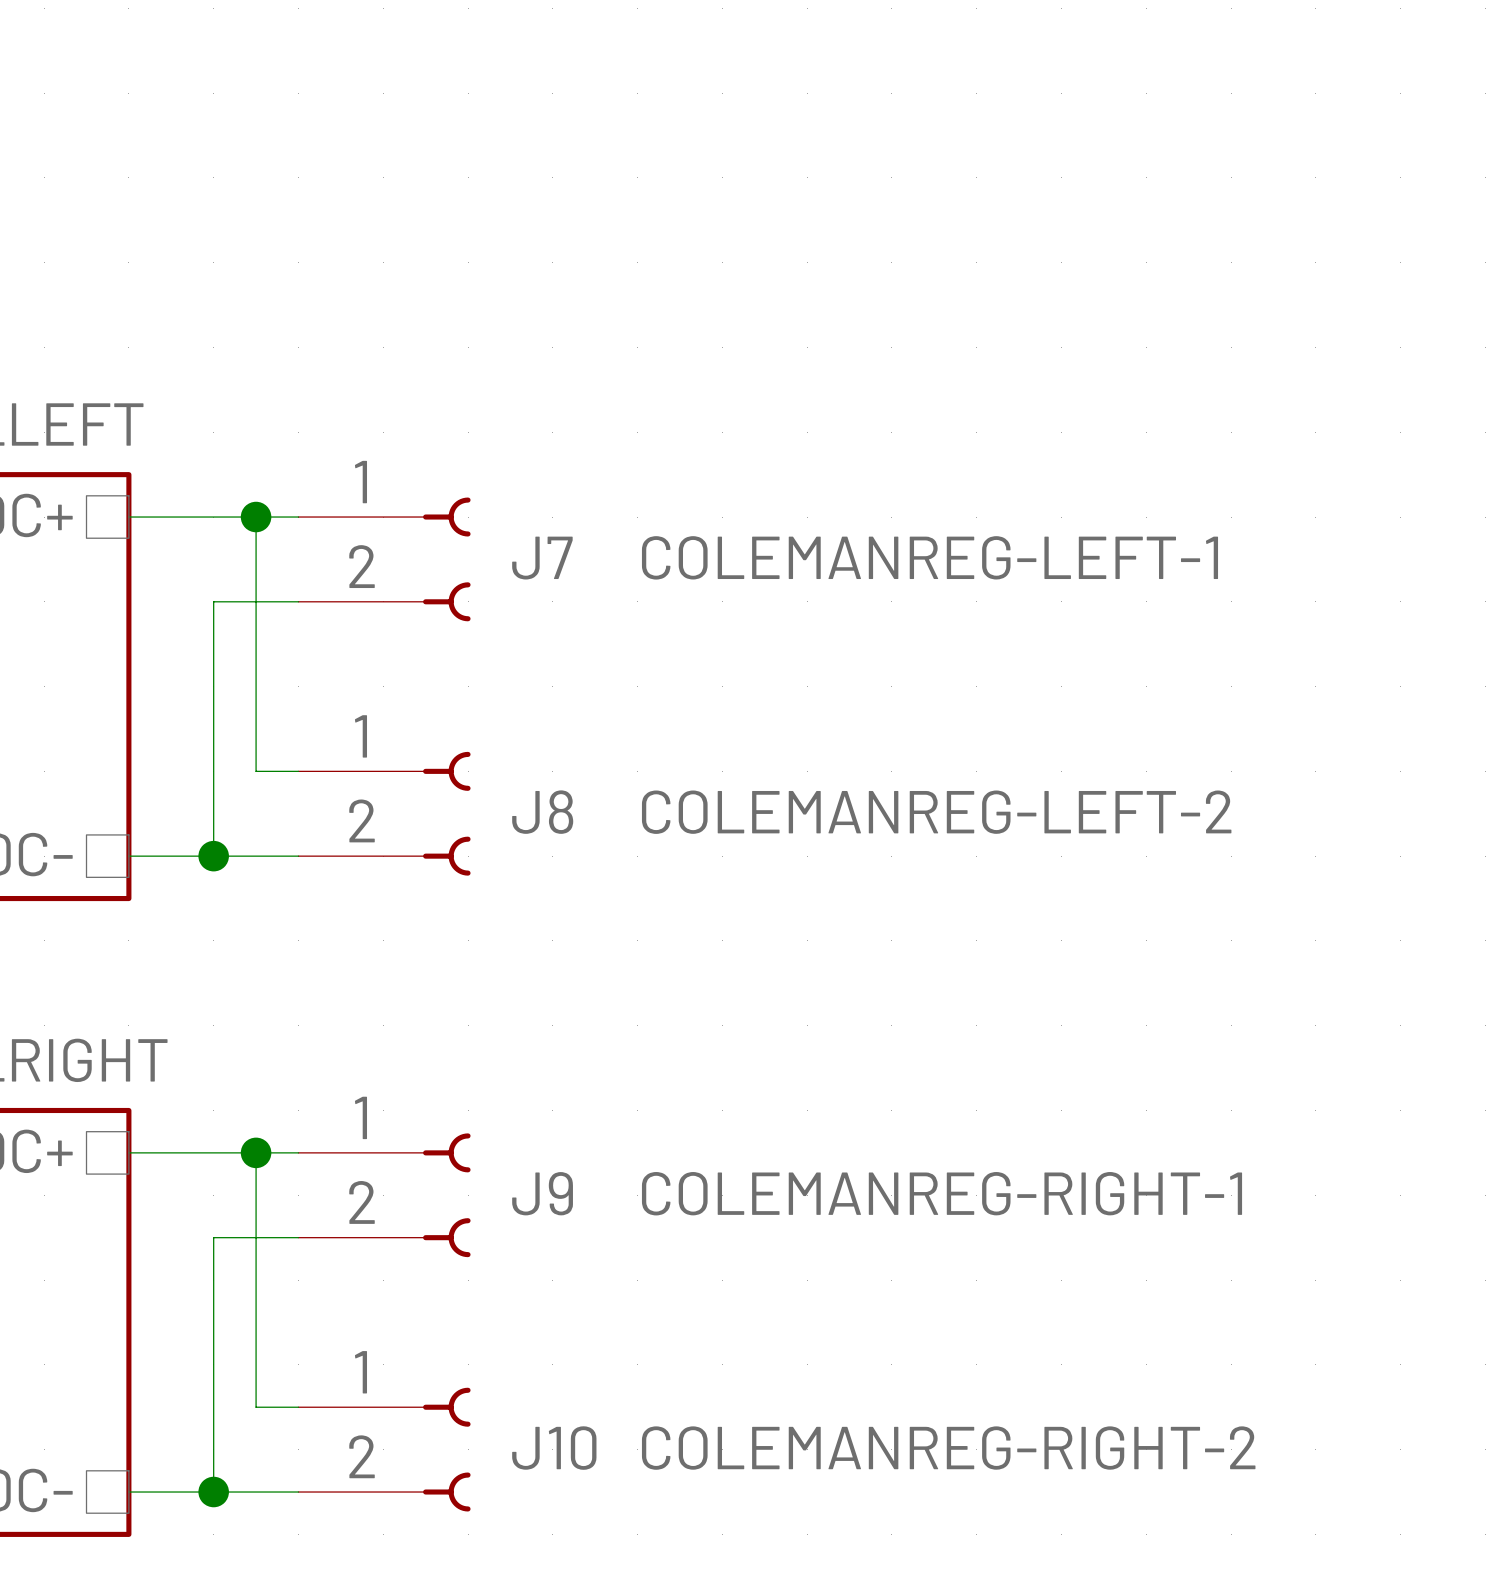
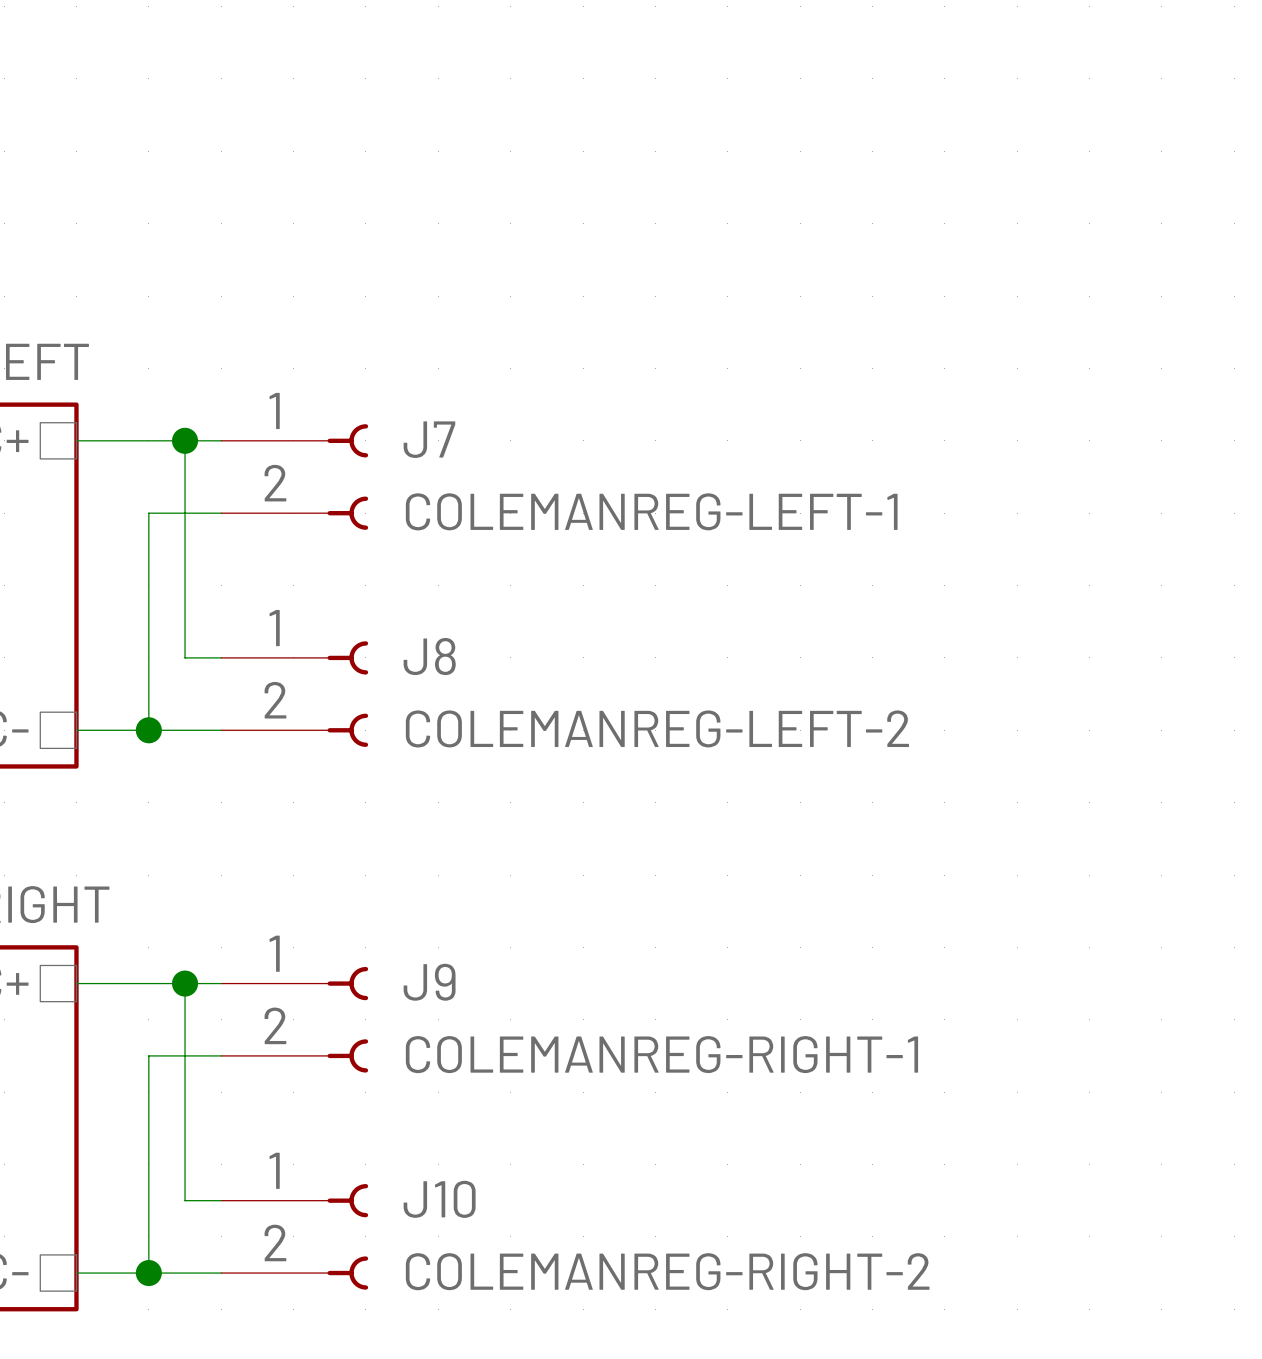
J7 value position: COLEMANREG-LEFT-1 (929, 557) -> COLEMANREG-LEFT-1 (651, 511)
J7 name position: J7 (542, 558) -> J7 (429, 439)
J8 name position: J8 (542, 812) -> J8 (429, 656)
J8 value position: COLEMANREG-LEFT-2 (936, 812) -> COLEMANREG-LEFT-2 (657, 728)
J9 name position: J9 (542, 1193) -> J9 (429, 982)
J9 value position: COLEMANREG-RIGHT-1 (942, 1193) -> COLEMANREG-RIGHT-1 (661, 1054)
J10 name position: J10 (554, 1448) -> J10 (439, 1199)
J10 value position: COLEMANREG-RIGHT-2 (948, 1448) -> COLEMANREG-RIGHT-2 (667, 1271)

